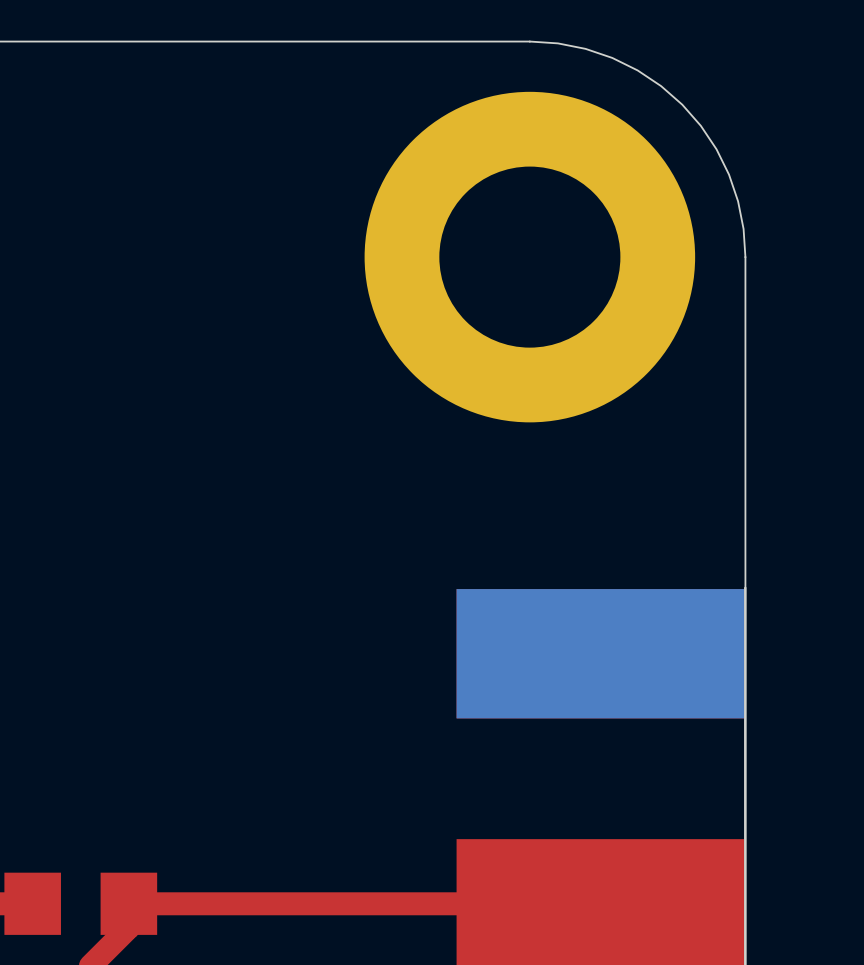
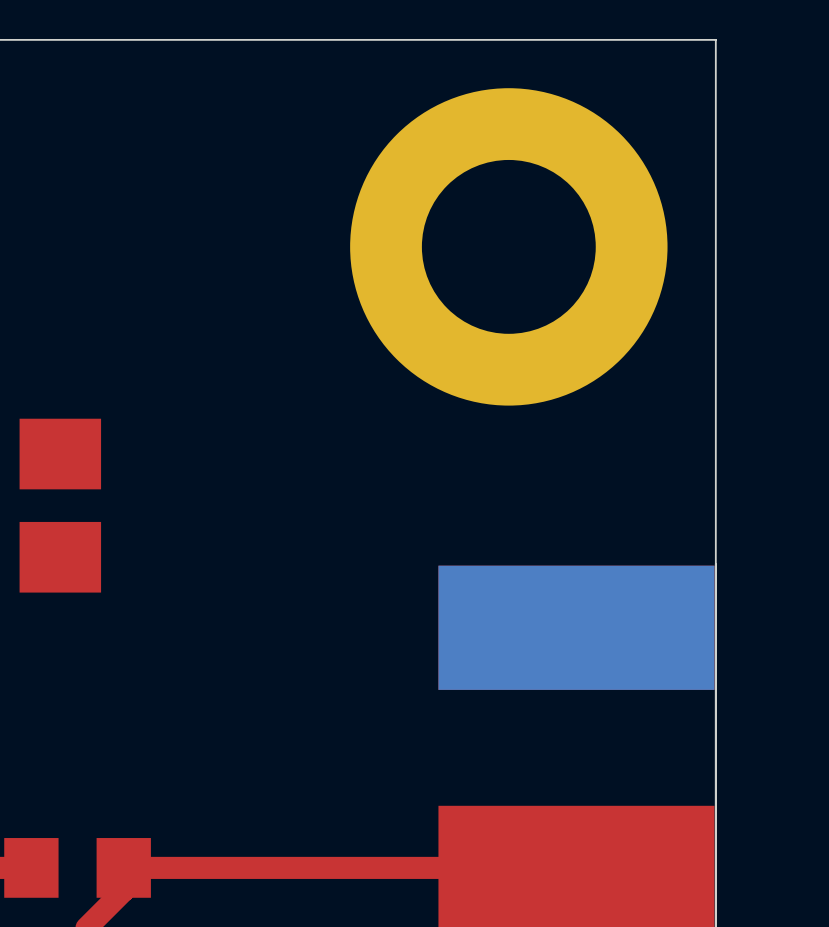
board edge: (529, 41) (558, 43) (585, 48) (612, 57) (637, 70) (661, 86) (682, 104) (700, 125) (716, 149) (729, 174) (738, 201) (743, 228) (745, 257) -> (508, 39) (715, 39) (715, 246)
part: none -> (60, 505)

